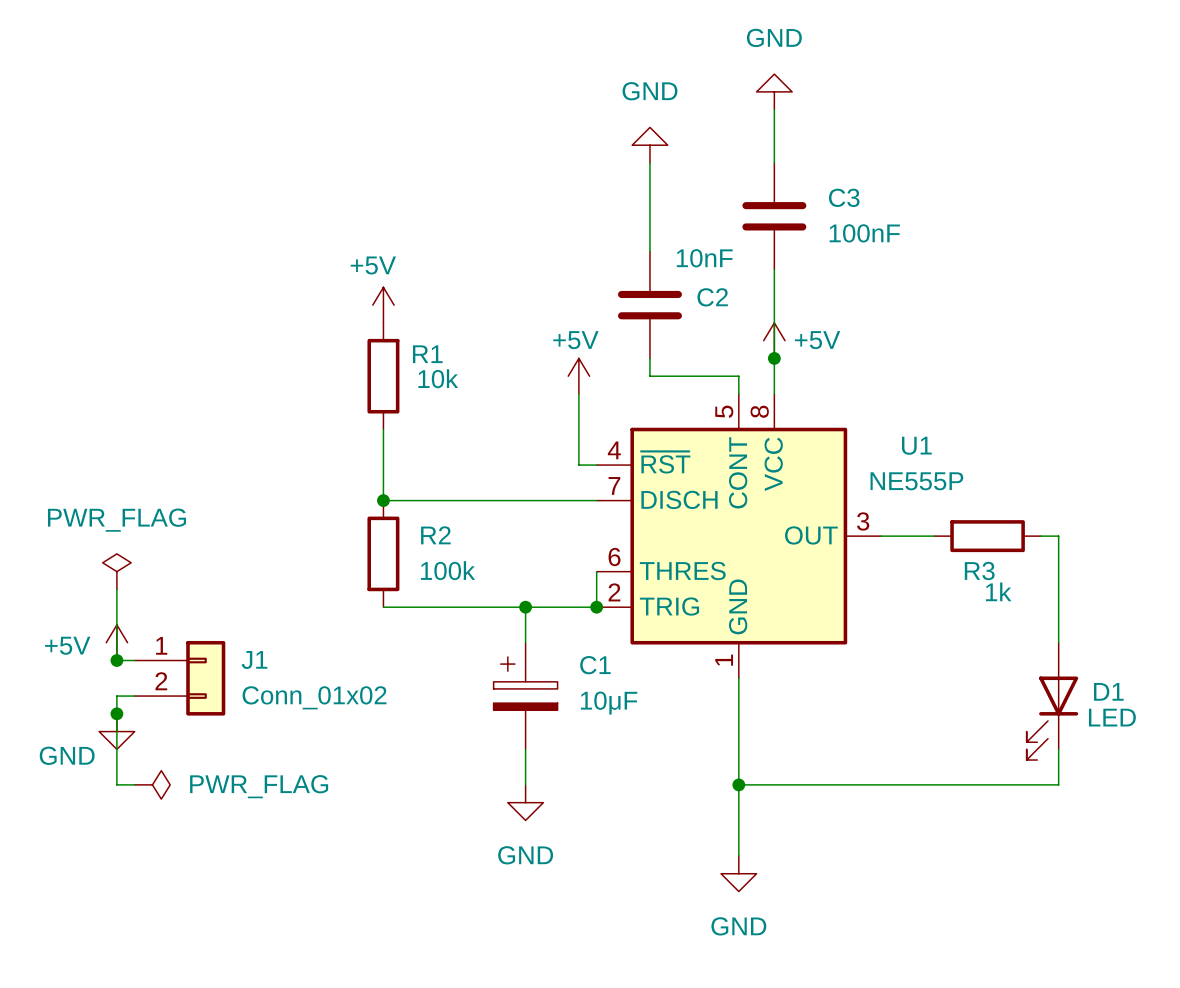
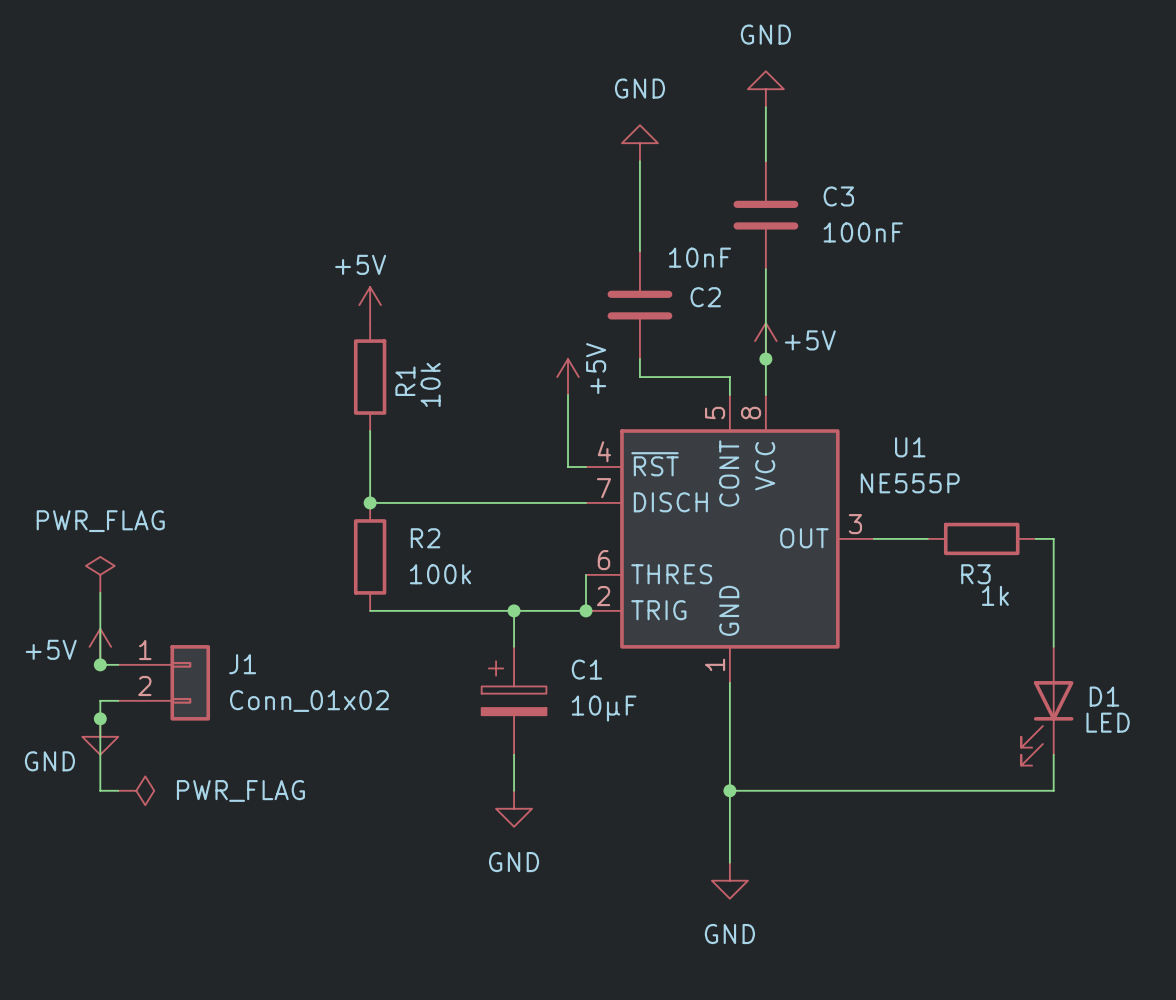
power symbol text rotation: 0° (575, 340) -> 90° counterclockwise (596, 368)
R1 name rotation: 0° (427, 354) -> 90° counterclockwise (405, 381)
R1 value rotation: 0° (438, 378) -> 90° counterclockwise (430, 384)

